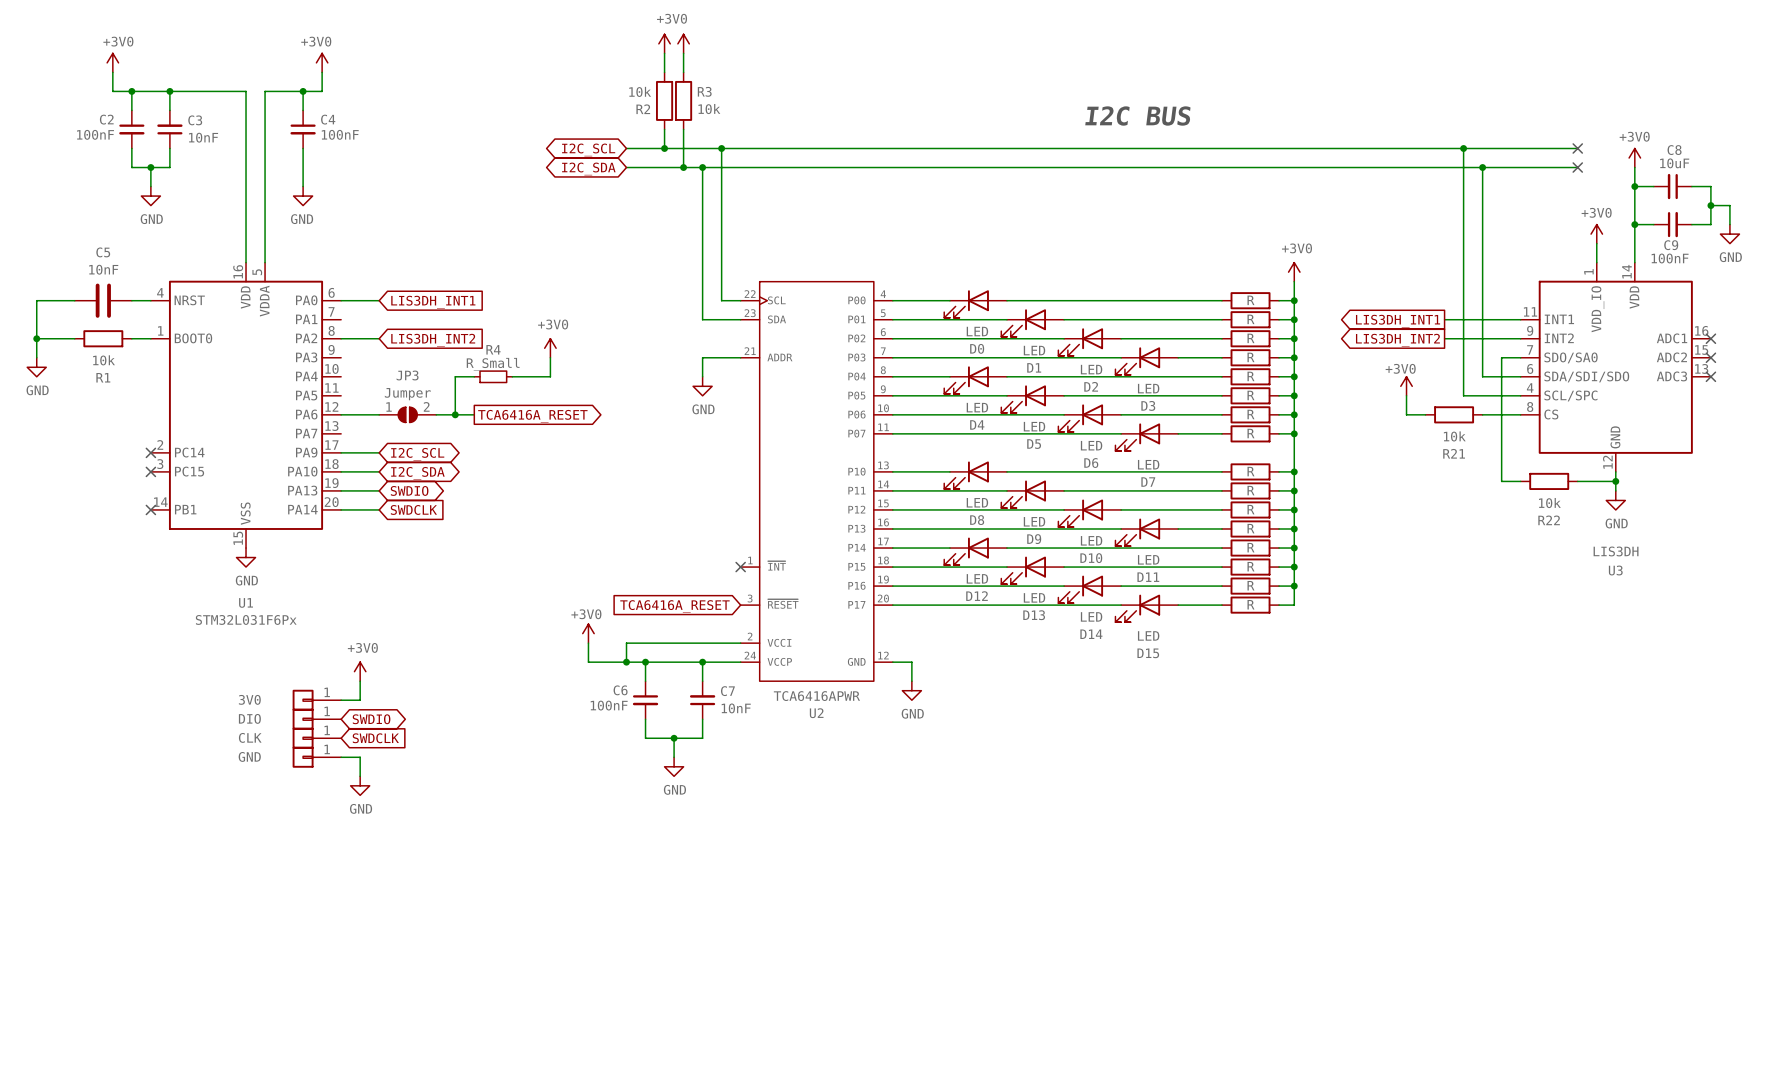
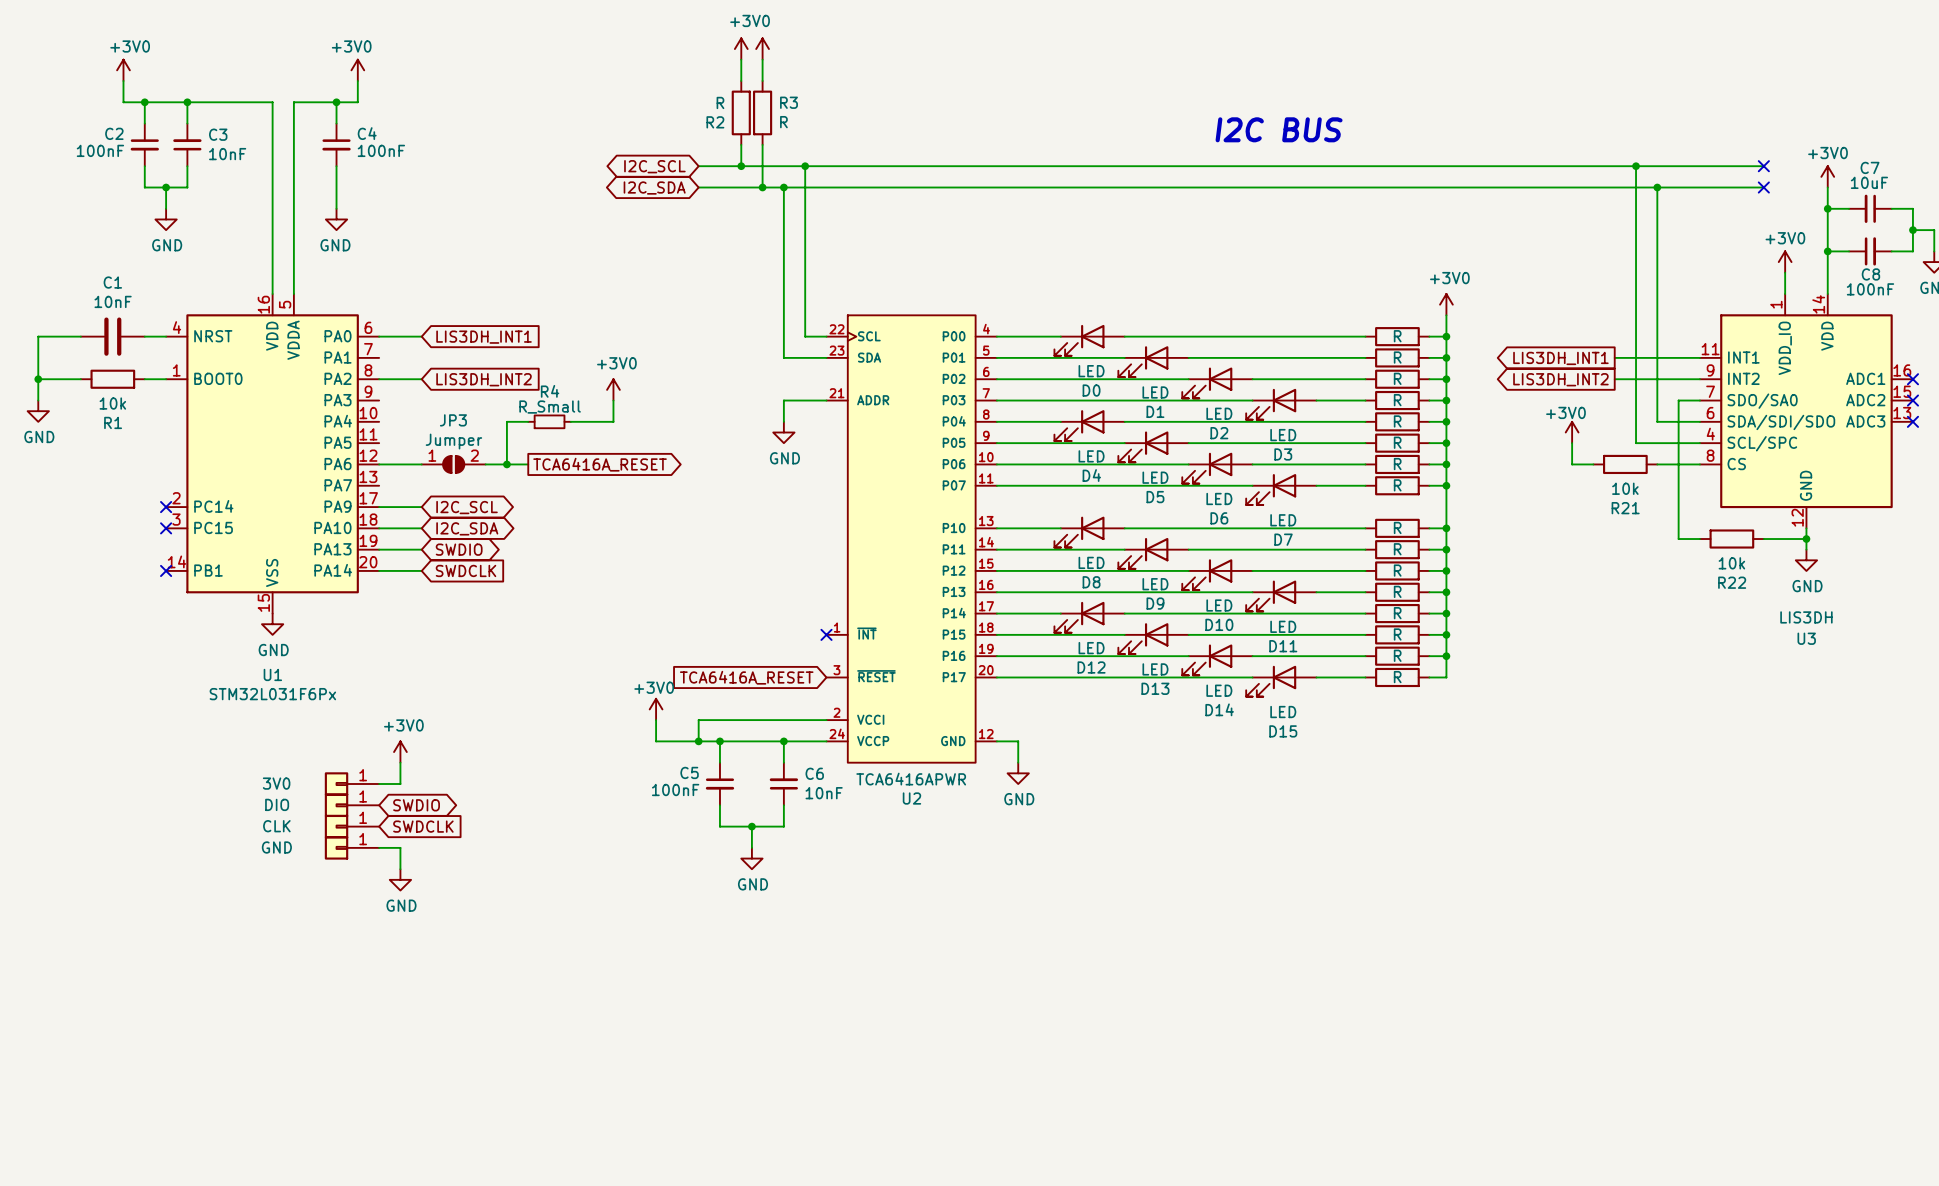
R2 value: 10k (640, 91) -> R (720, 102)
R3 value: 10k (709, 109) -> R (783, 122)
C8 name: C8 (1674, 150) -> C7 (1870, 167)
C9 name: C9 (1671, 245) -> C8 (1870, 274)
C5 name: C5 (103, 252) -> C1 (112, 282)
C6 name: C6 (620, 690) -> C5 (689, 772)
C7 name: C7 (727, 691) -> C6 (814, 773)

